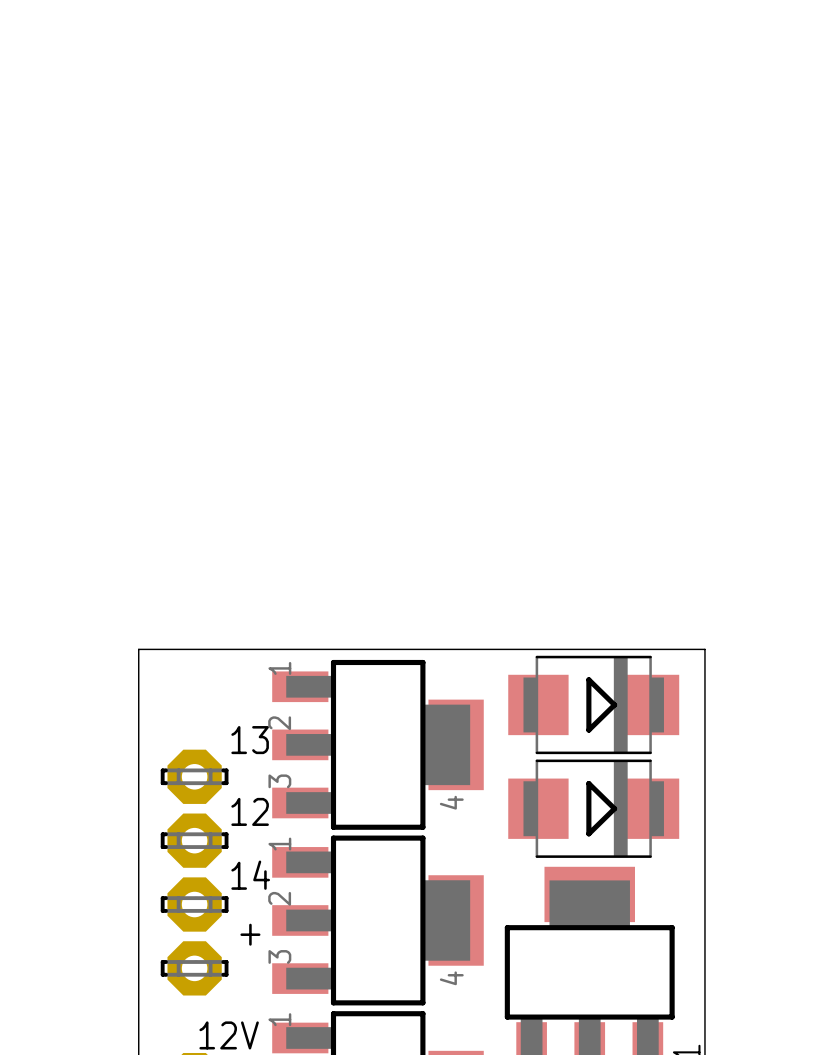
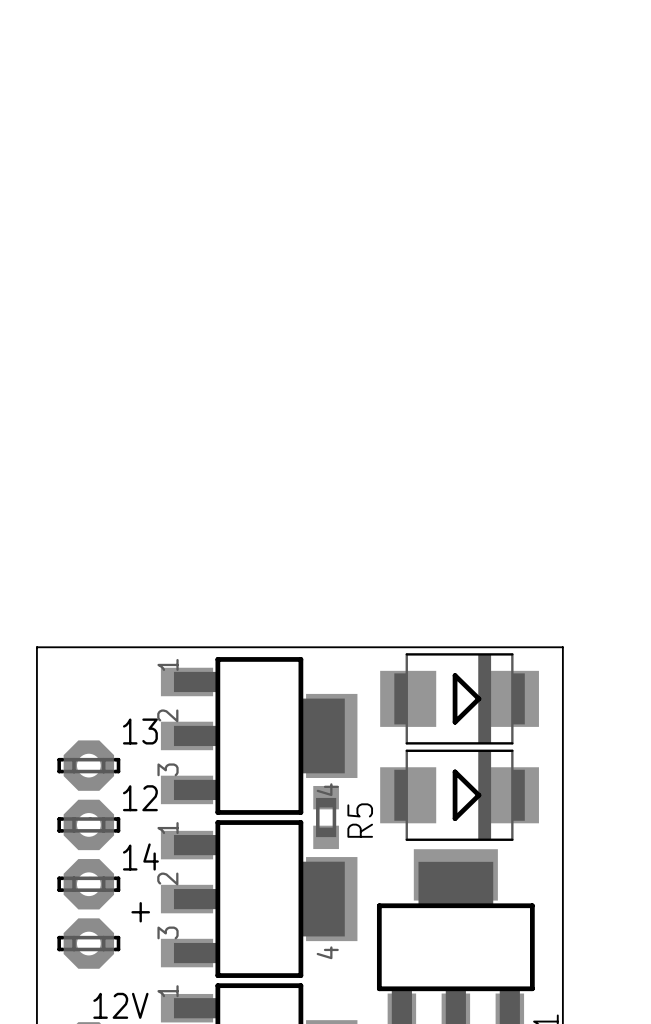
R5: none -> (326, 817)

